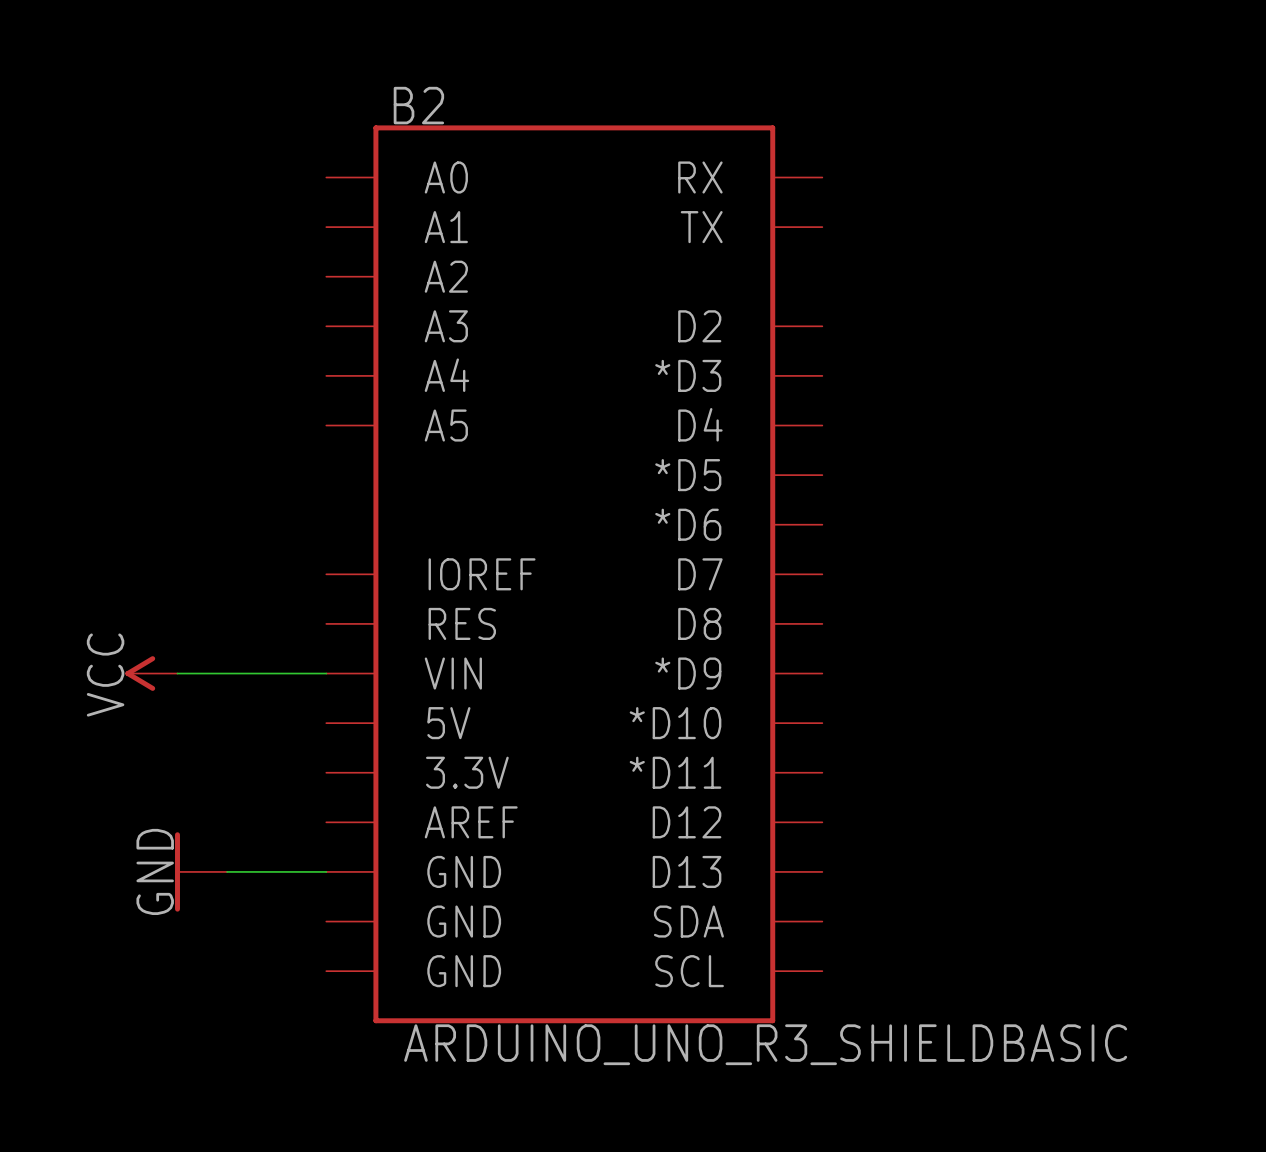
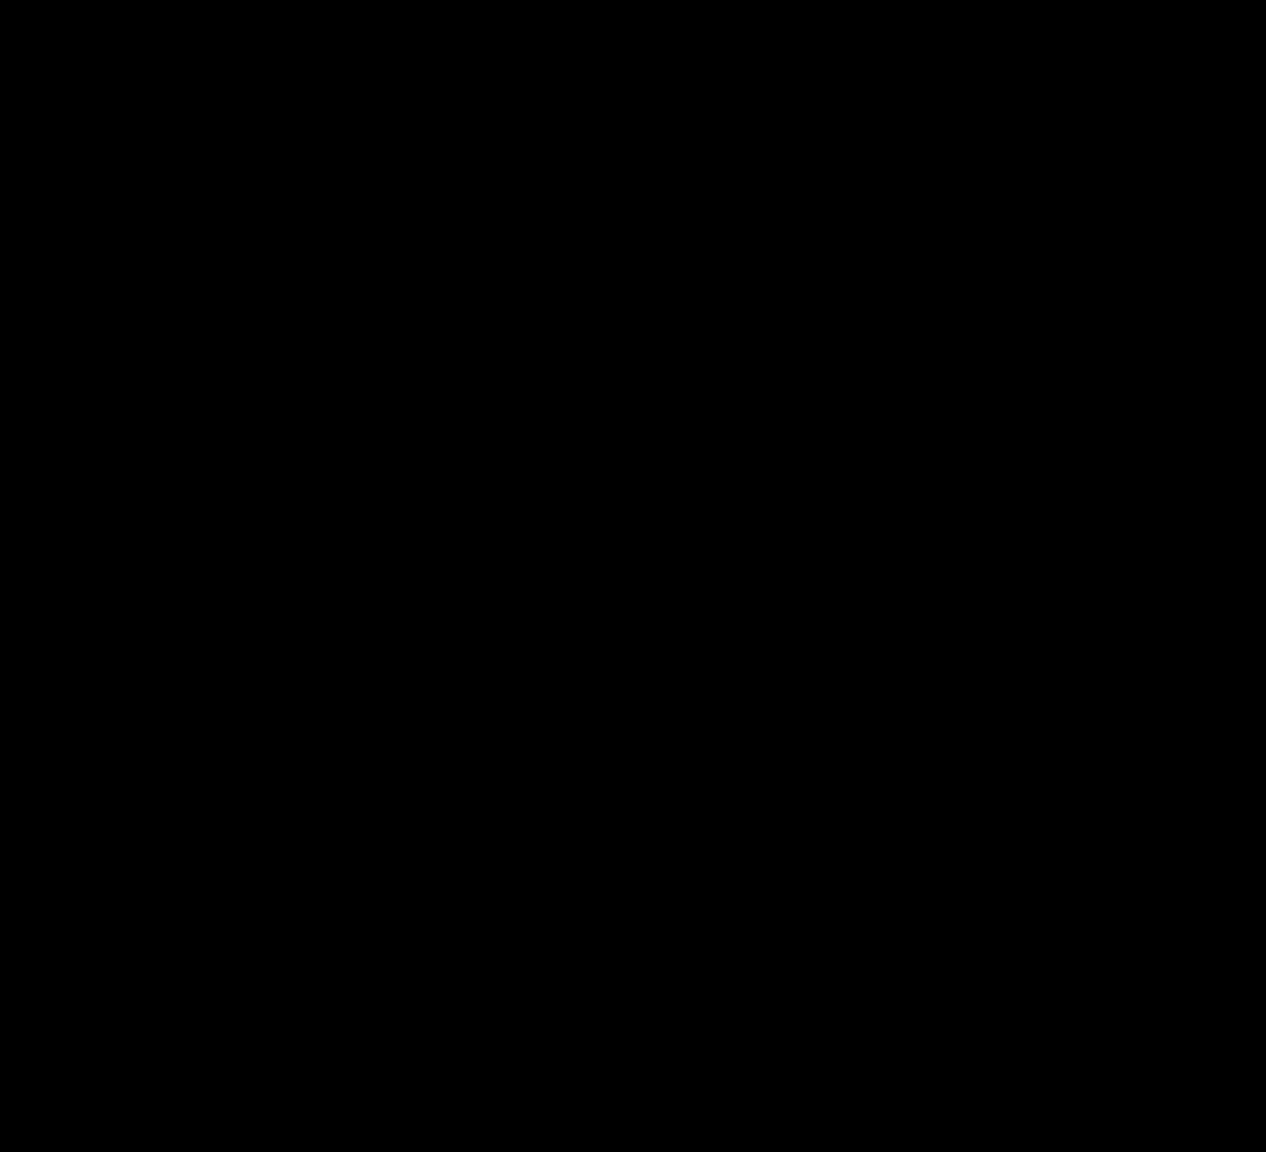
B2: ARDUINO_UNO_R3_SHIELDBASIC (574, 574) -> none
power symbol: VCC (151, 673) -> none
wire: (177, 673) (326, 673) -> none
power symbol: GND (201, 871) -> none
wire: (227, 871) (326, 871) -> none

